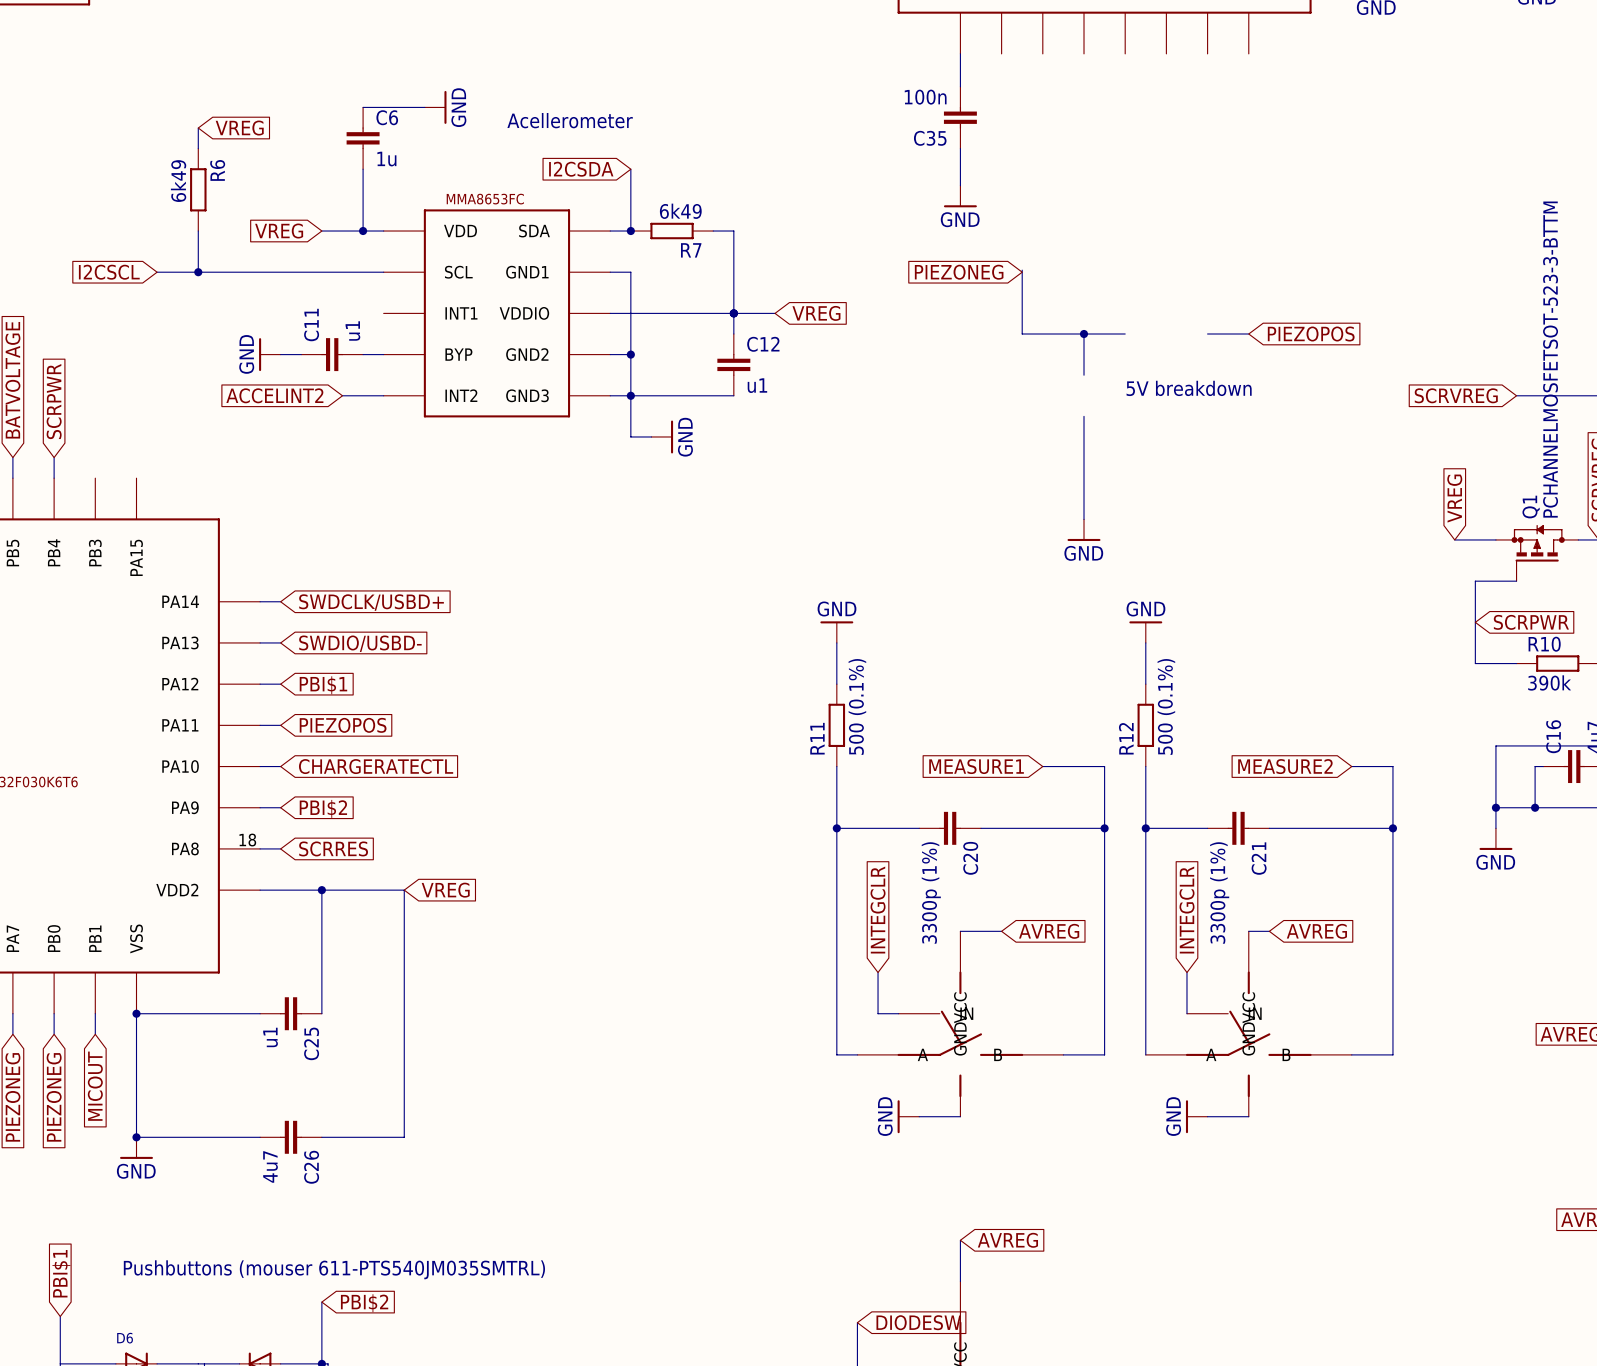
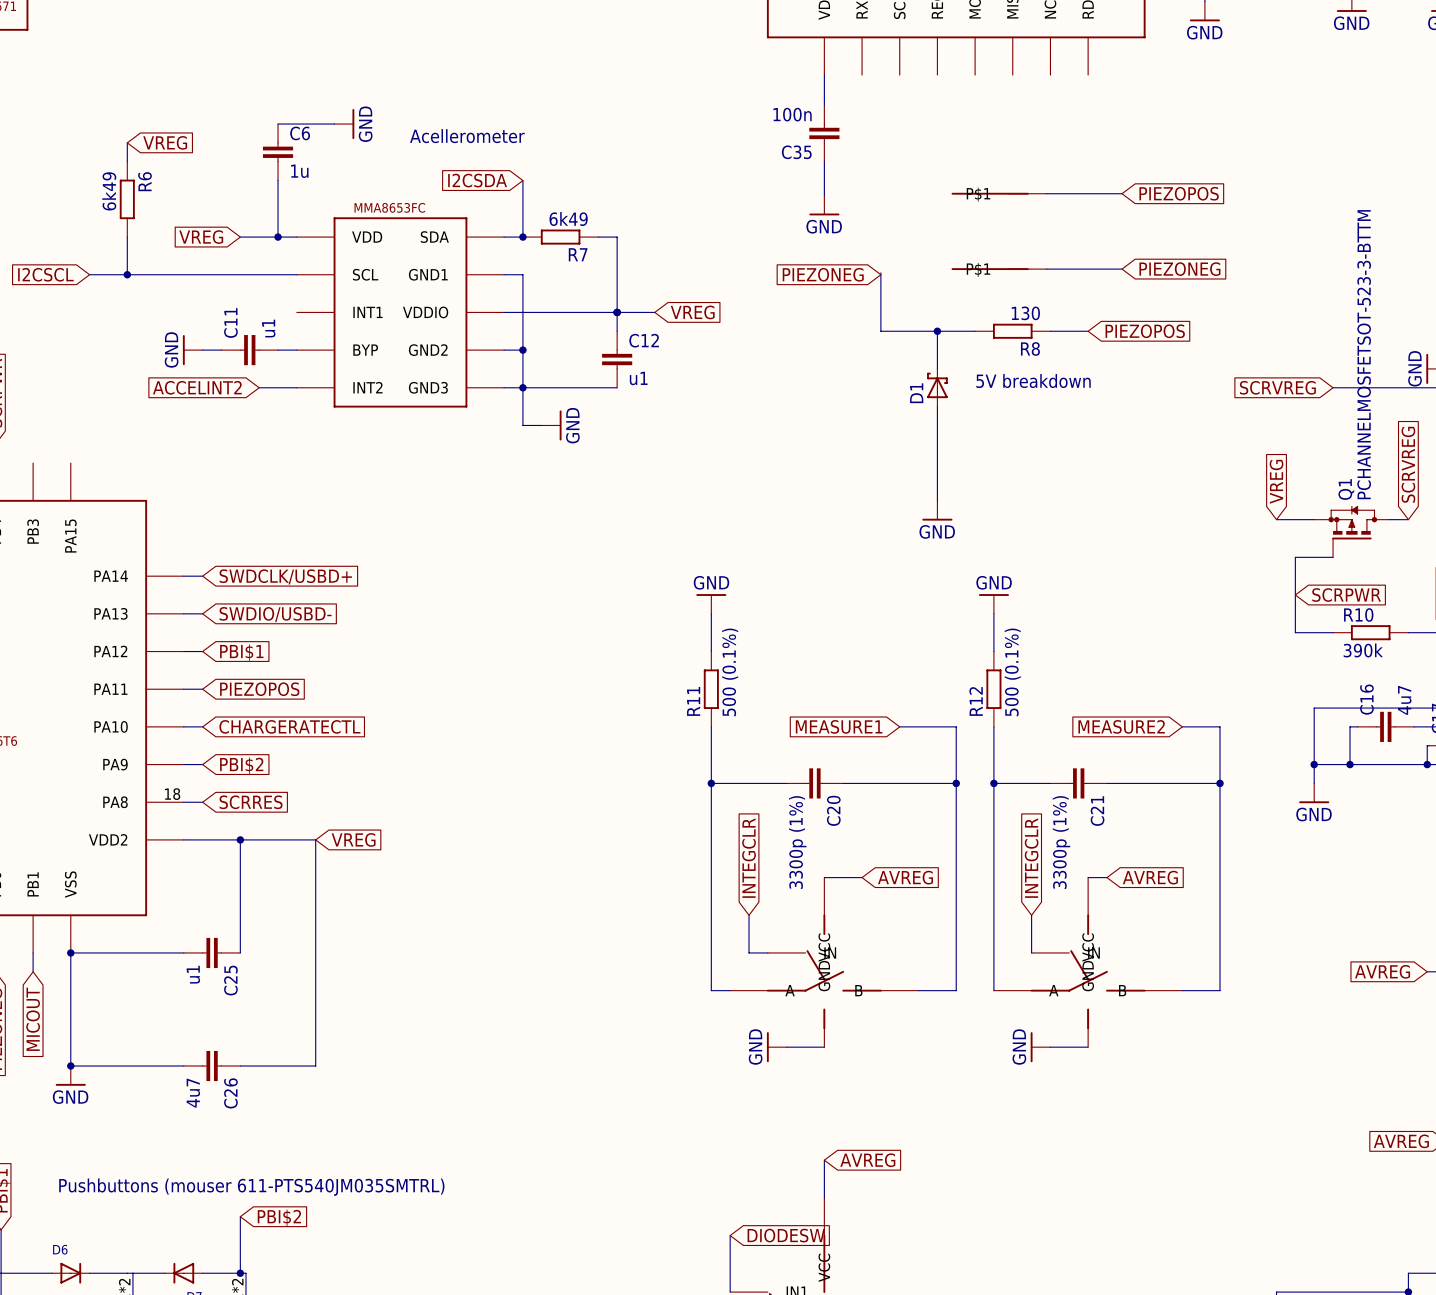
part: none -> (999, 193)
wire: none -> (1046, 193) (1122, 193)
global label: none -> PIEZOPOS (1179, 193)
part: none -> (999, 269)
wire: none -> (1046, 269) (1122, 269)
global label: none -> PIEZONEG (1179, 269)
R8: none -> 130 (1012, 331)
D1: none -> (937, 387)

